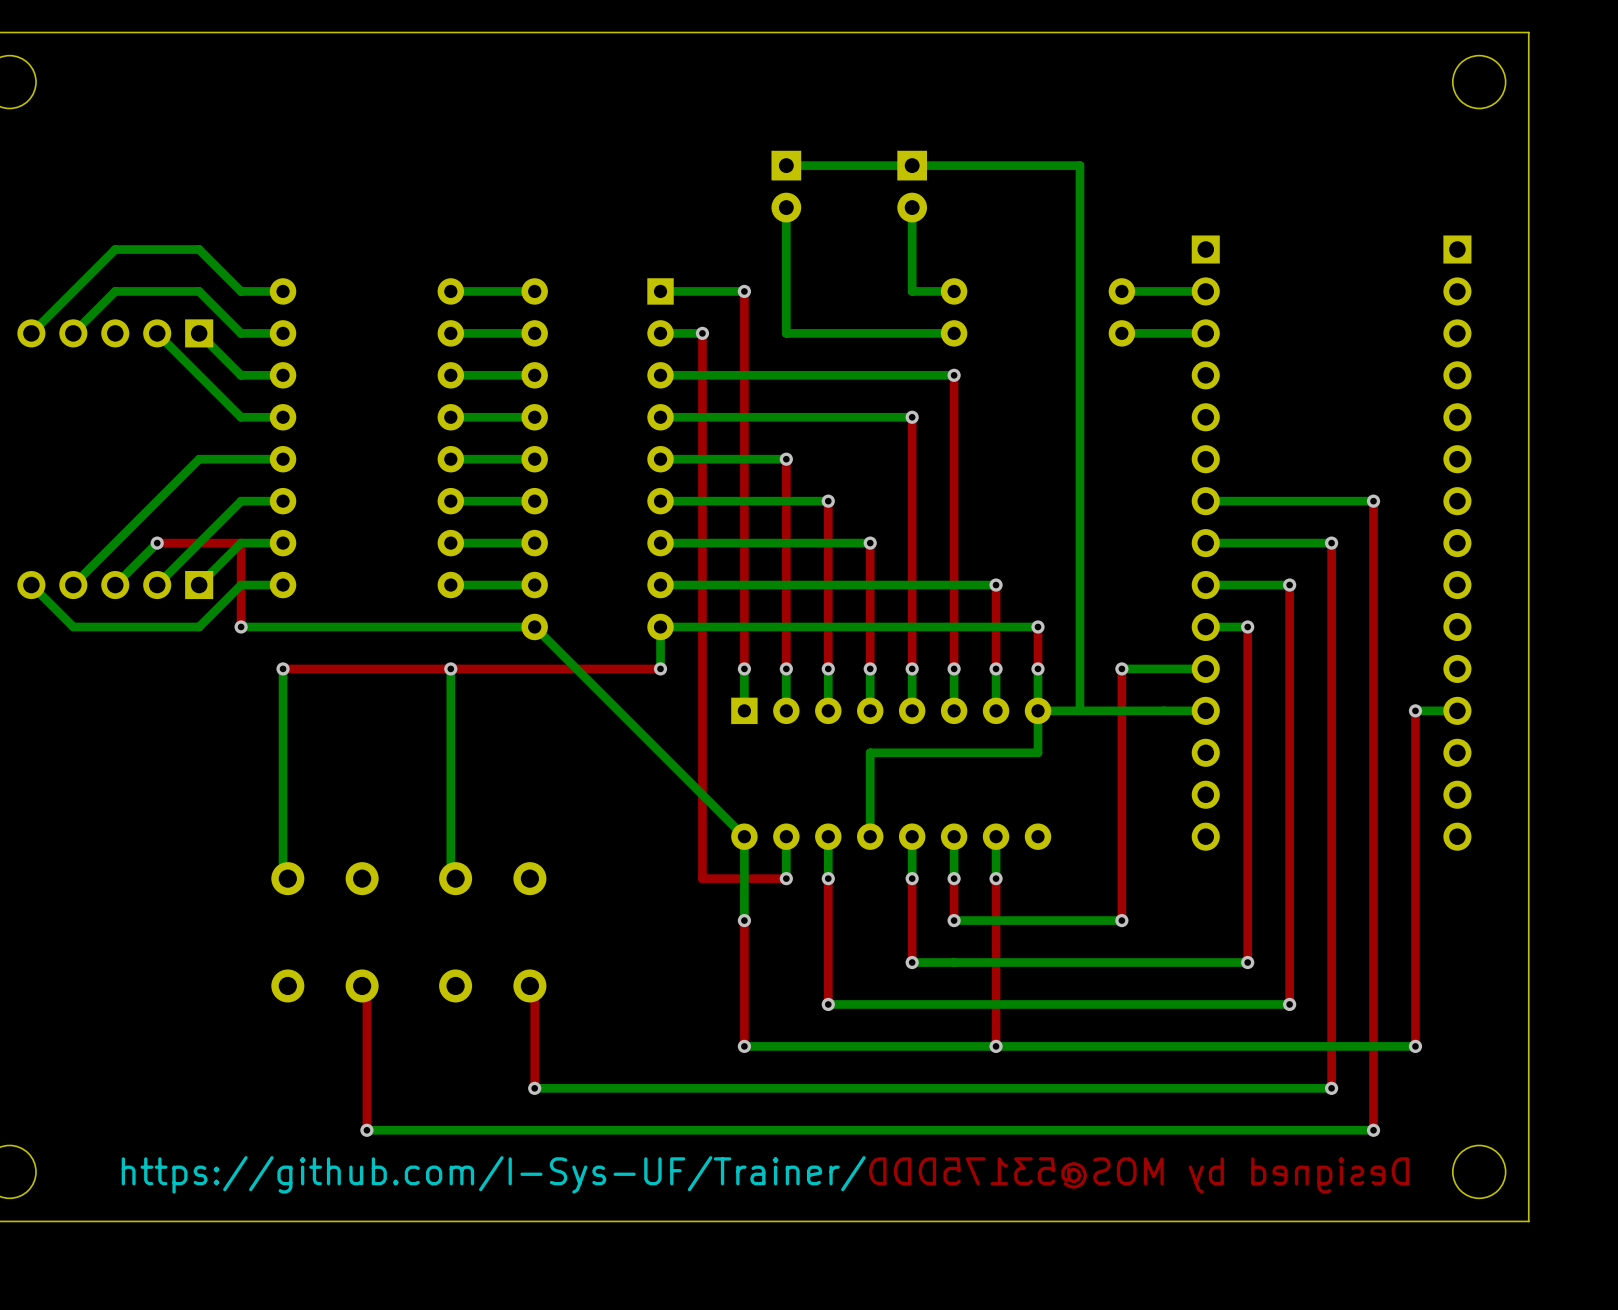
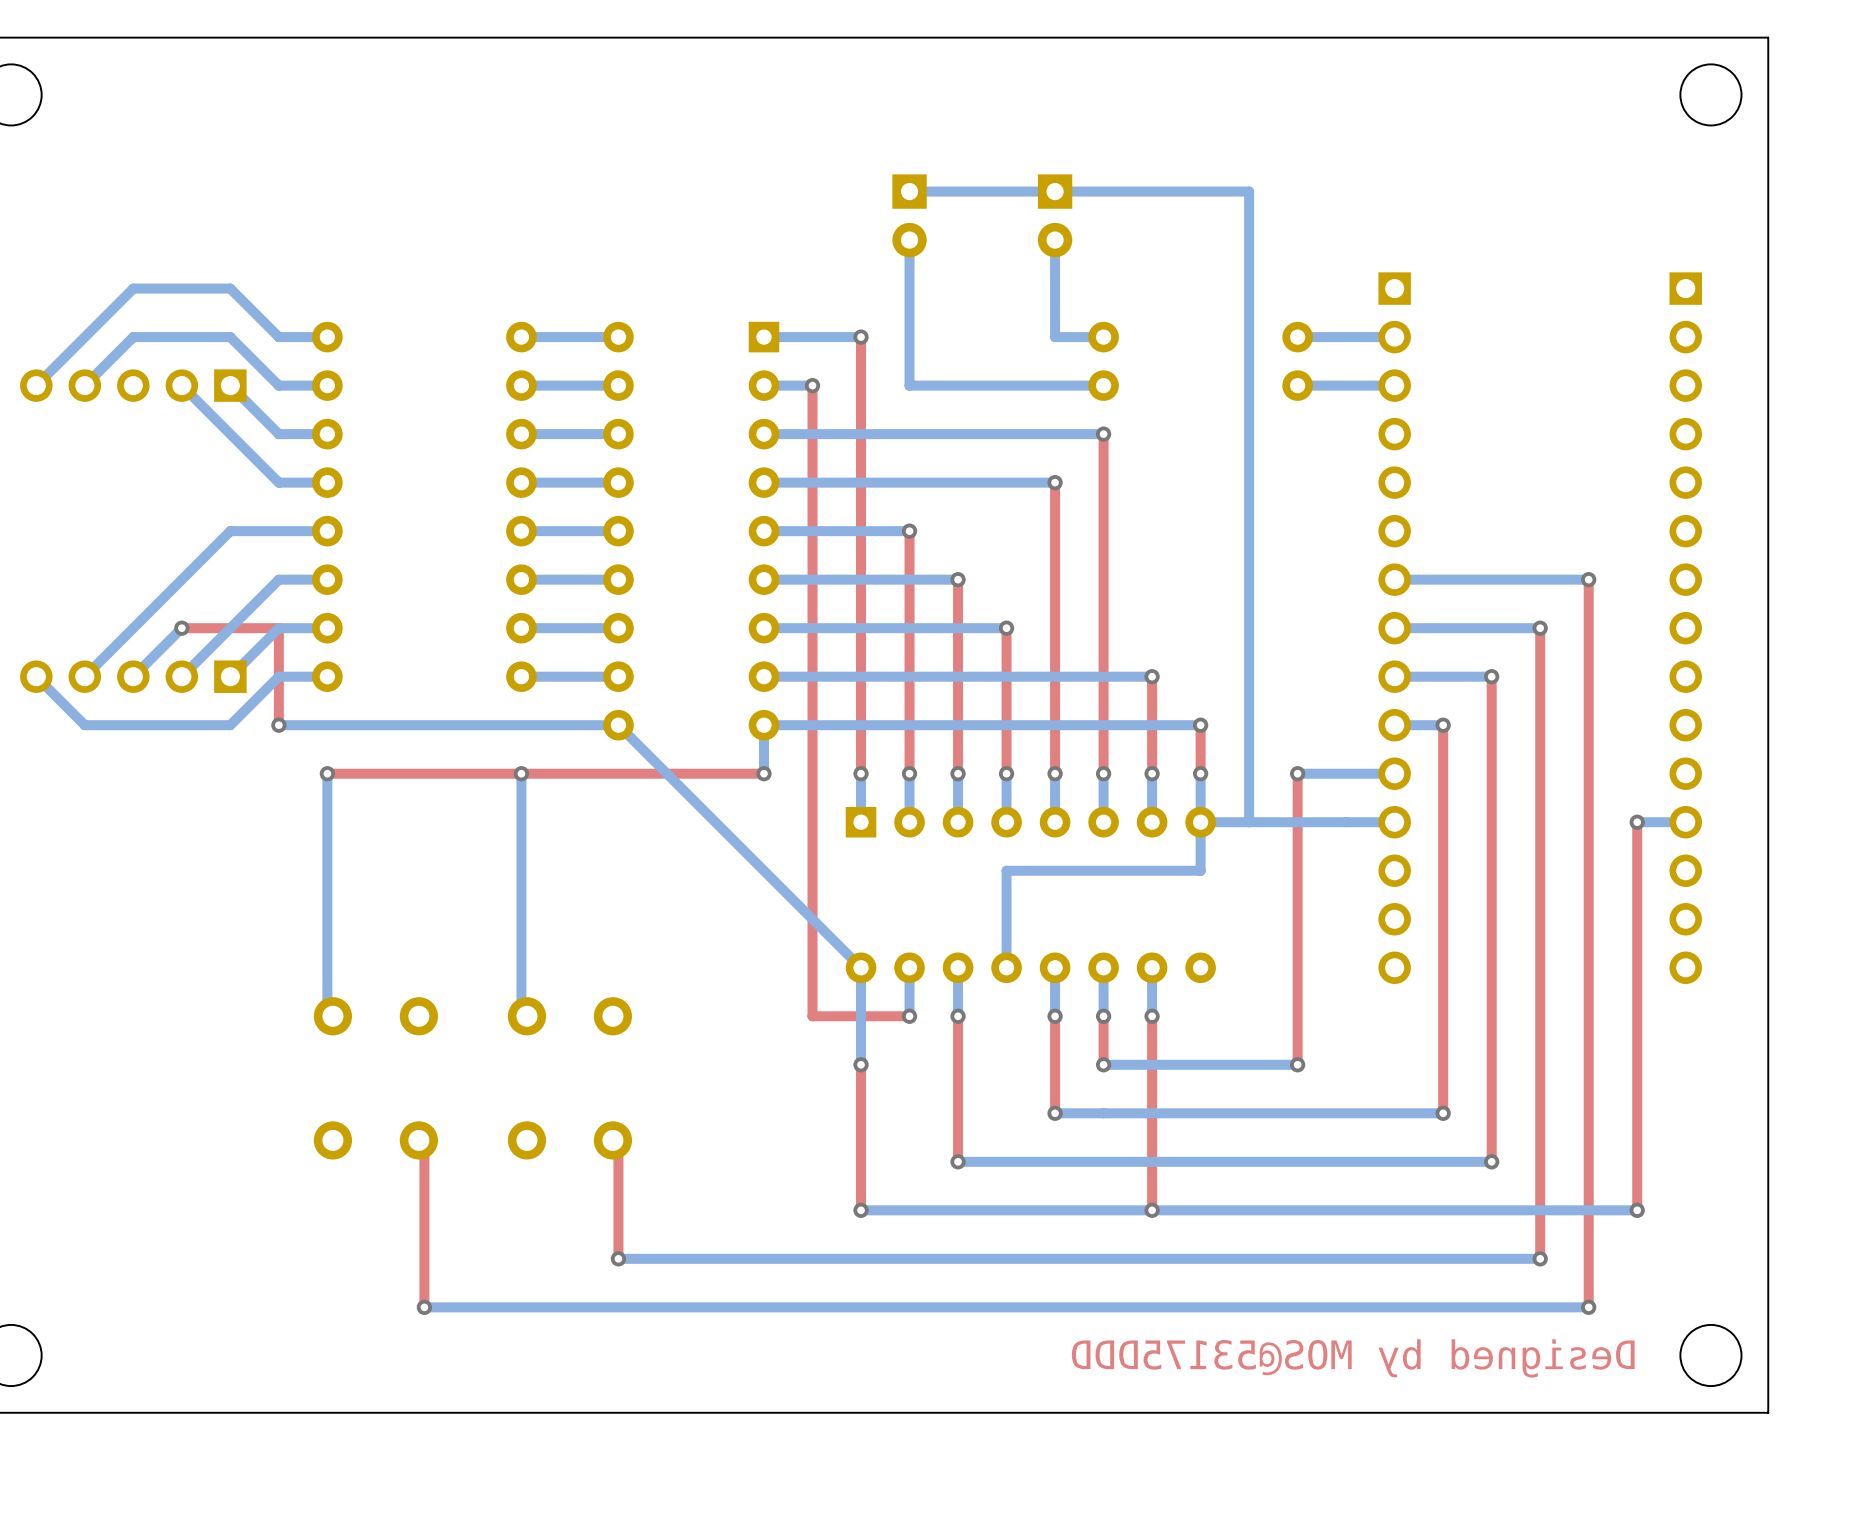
text: https://github.com/I-Sys-UF/Trainer/ (493, 1174) -> none

